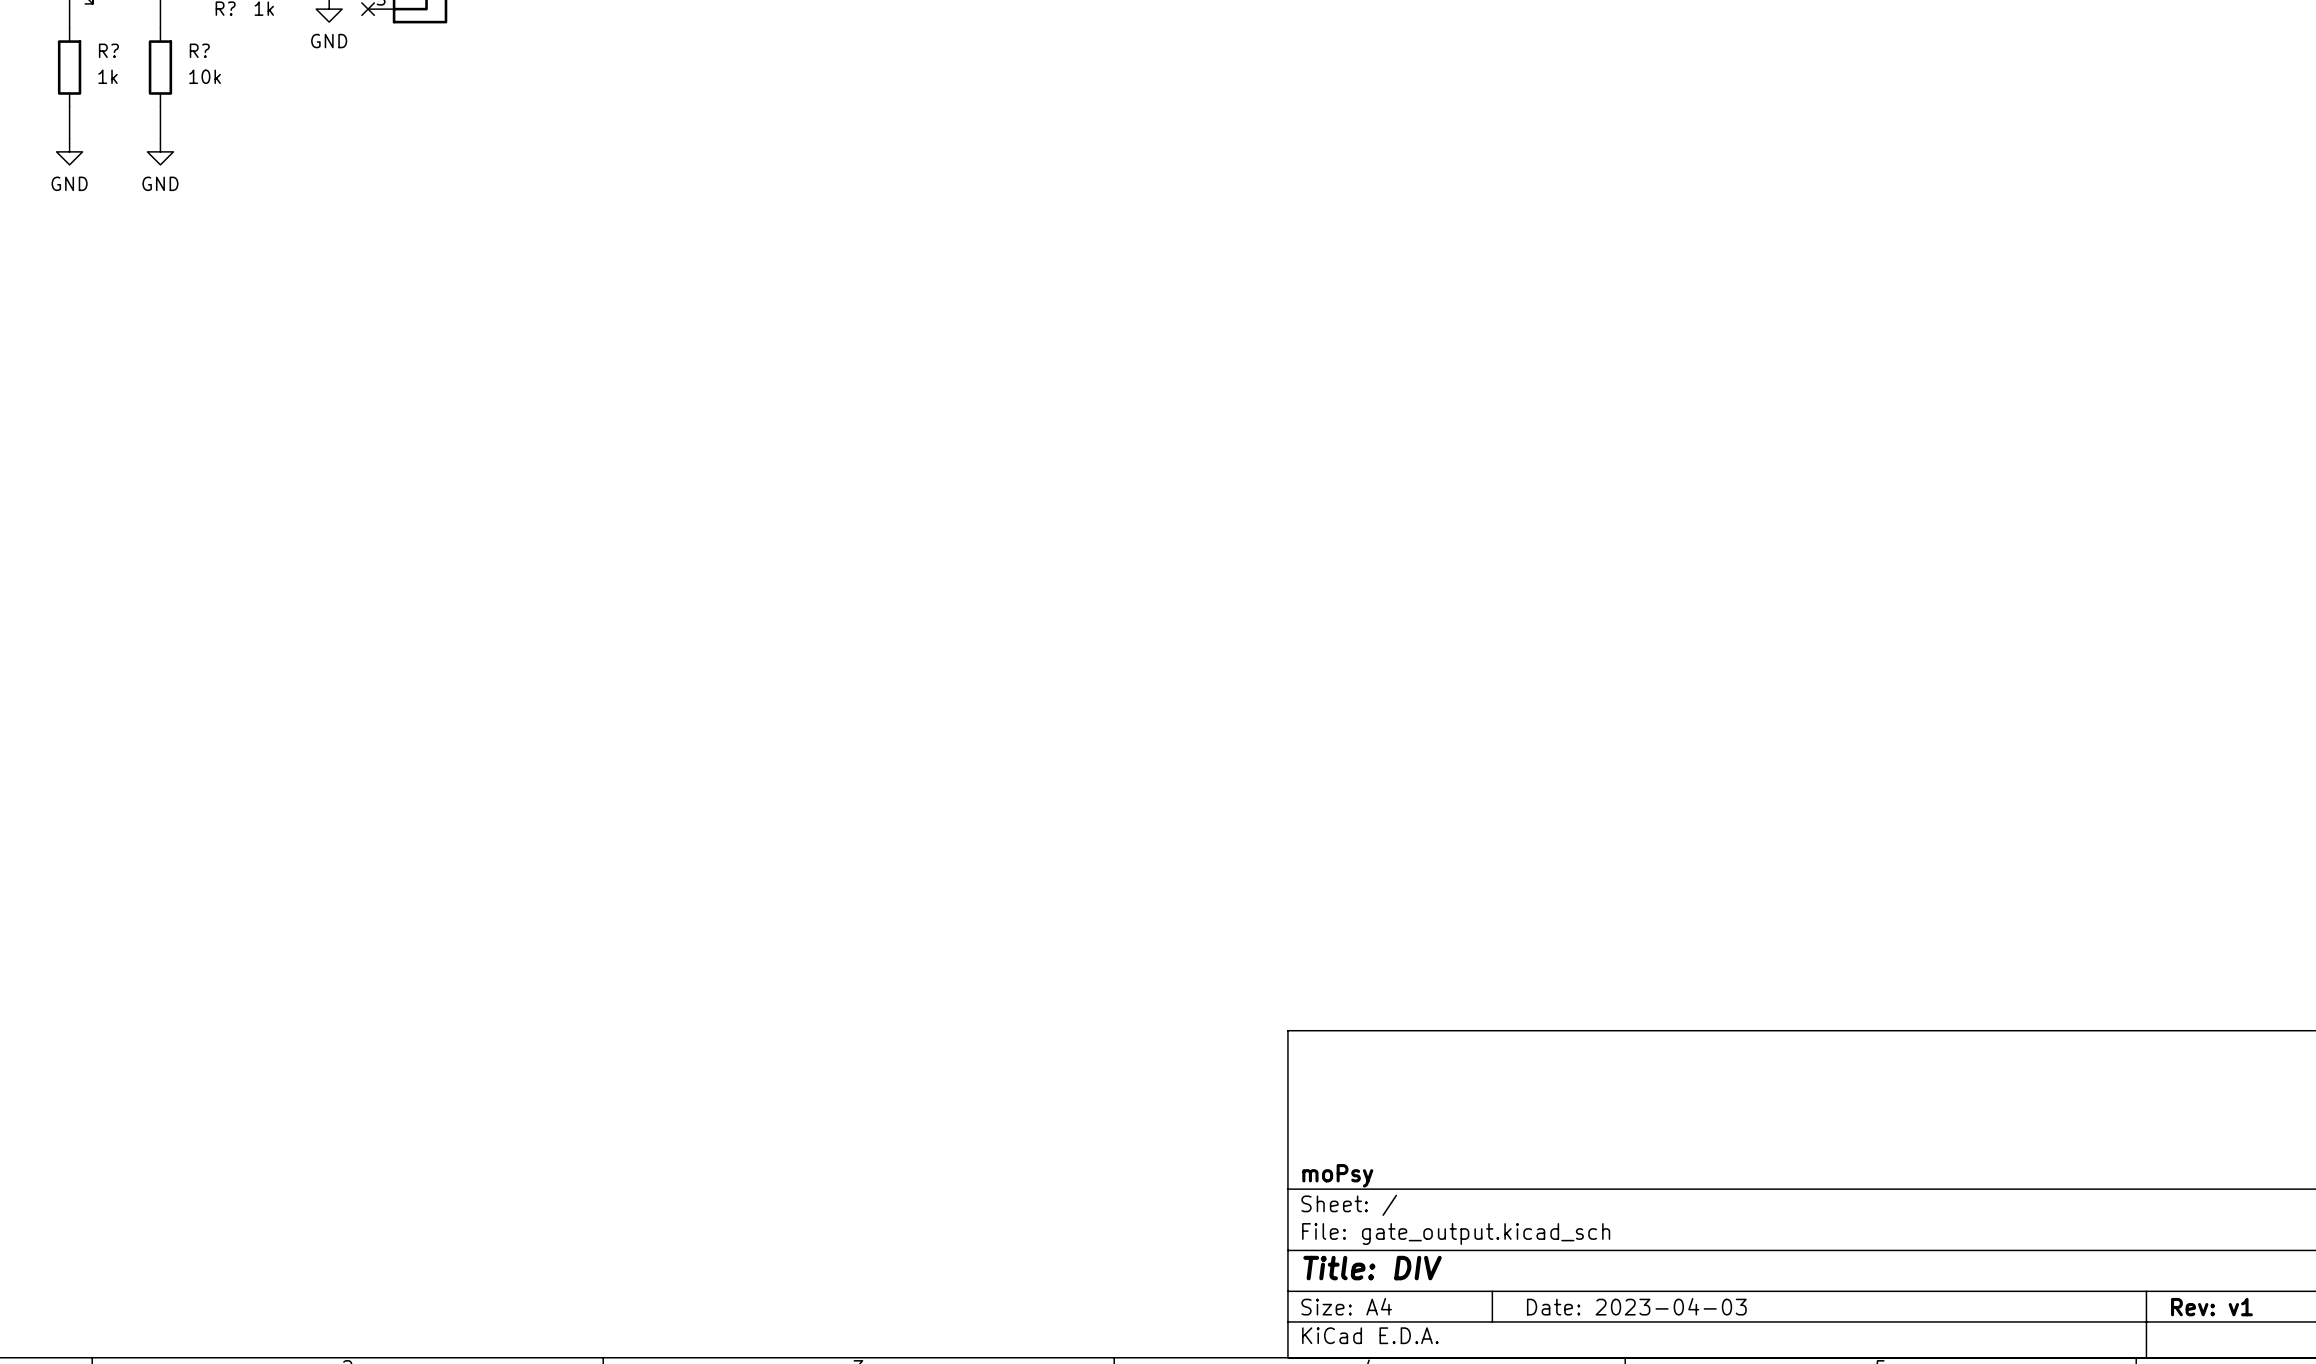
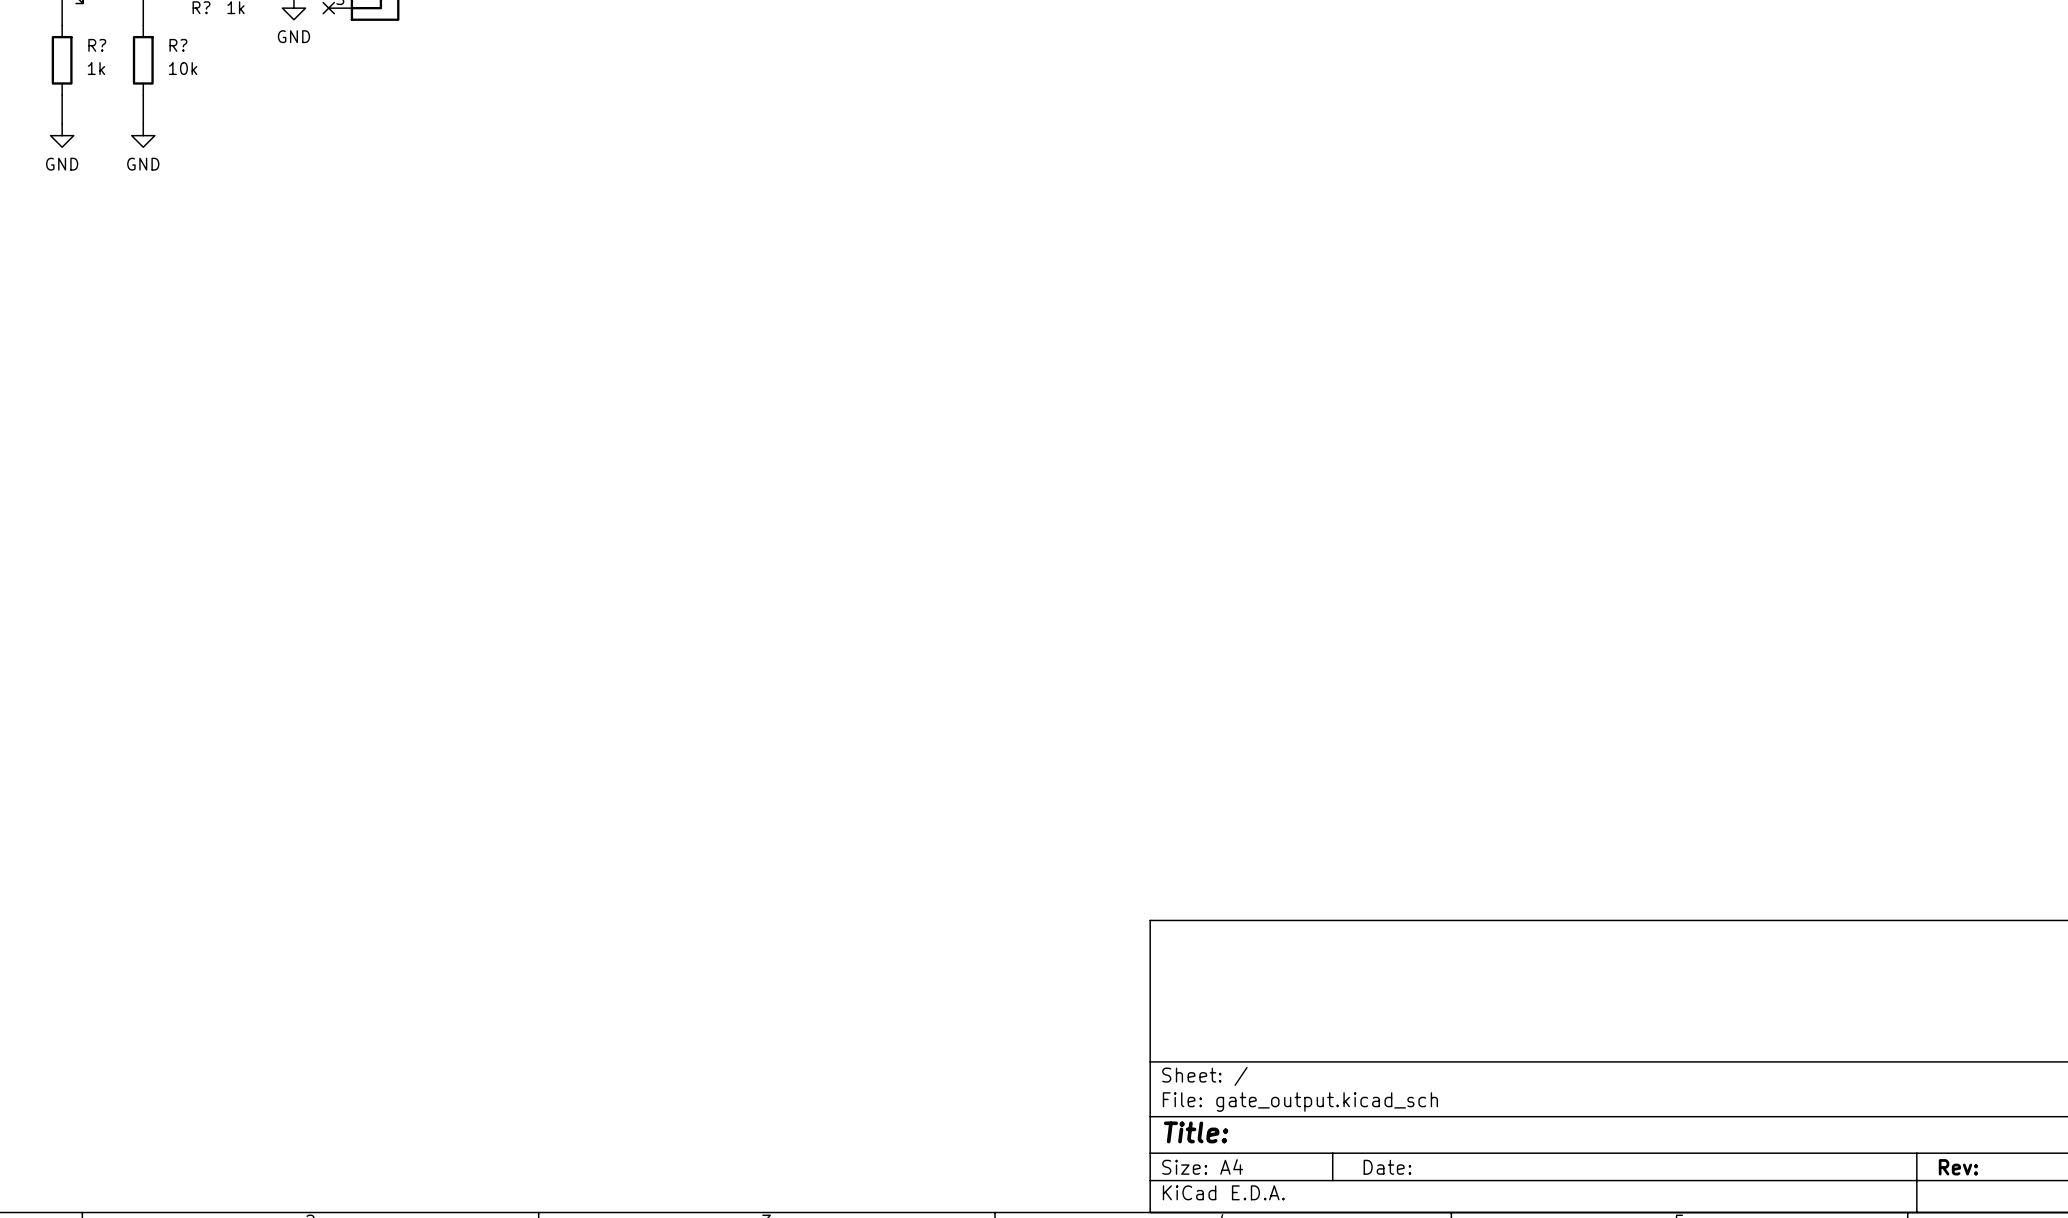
title block: moPsy (1337, 1175) -> none
title block: Title: DIV (1372, 1268) -> Title: (1196, 1132)
title block: Date: 2023-04-03 (1636, 1306) -> Date: (1387, 1167)
title block: Rev: v1 (2211, 1307) -> Rev: (1958, 1167)

